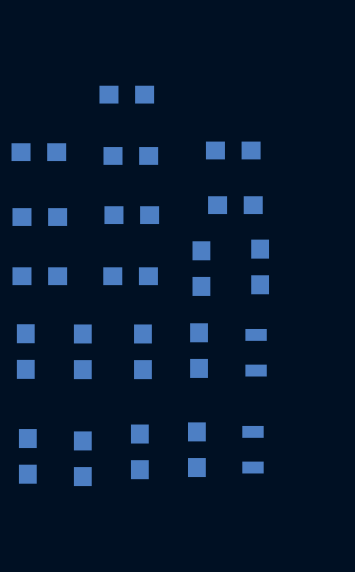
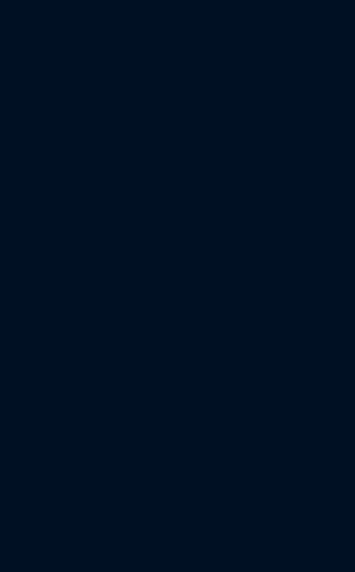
part: (126, 94) -> none
part: (233, 150) -> none
part: (38, 152) -> none
part: (130, 155) -> none
part: (235, 205) -> none
part: (131, 215) -> none
part: (39, 217) -> none
part: (260, 266) -> none
part: (201, 268) -> none
part: (39, 276) -> none
part: (130, 276) -> none
part: (199, 350) -> none
part: (25, 351) -> none
part: (82, 351) -> none
part: (142, 351) -> none
part: (256, 352) -> none
part: (196, 449) -> none
part: (252, 449) -> none
part: (139, 451) -> none
part: (27, 456) -> none
part: (82, 458) -> none

